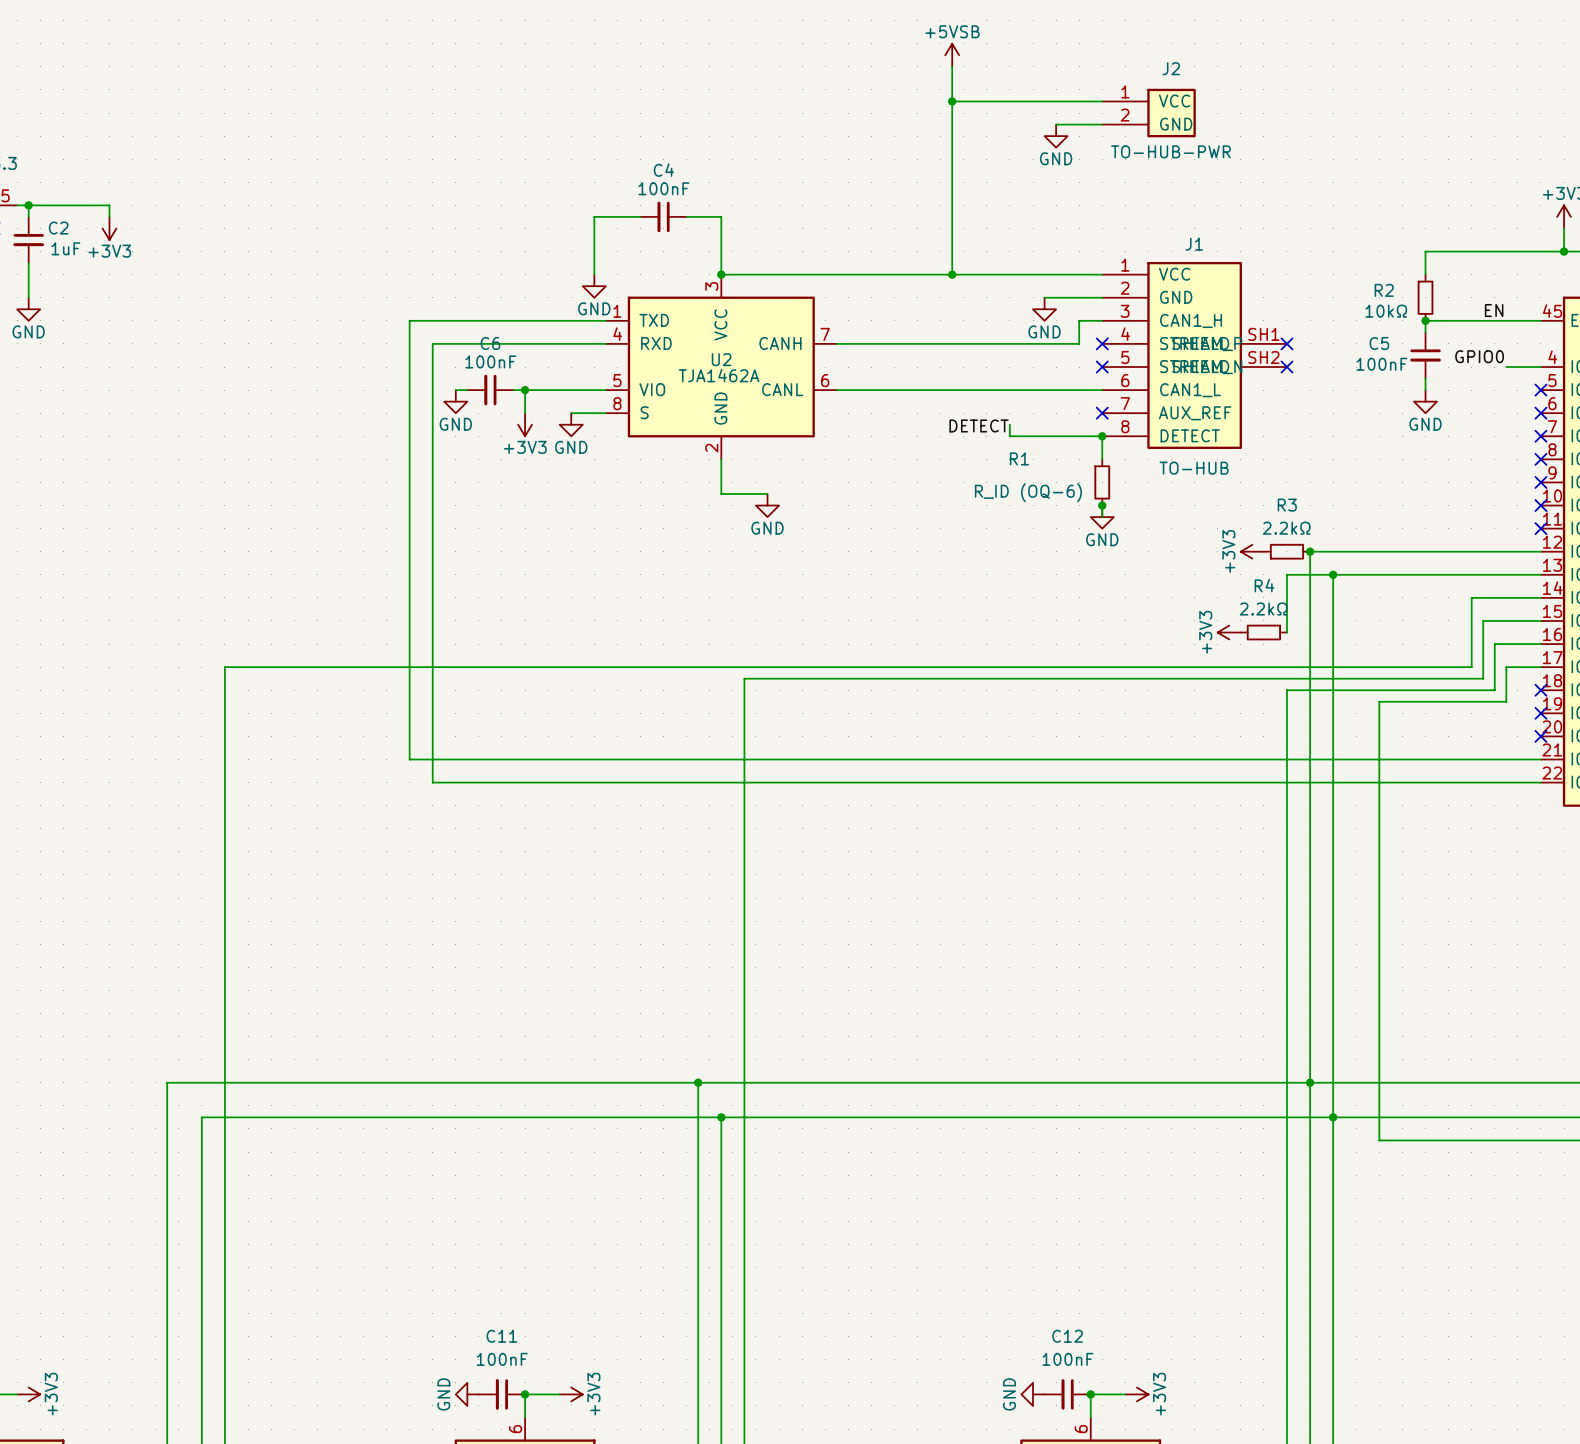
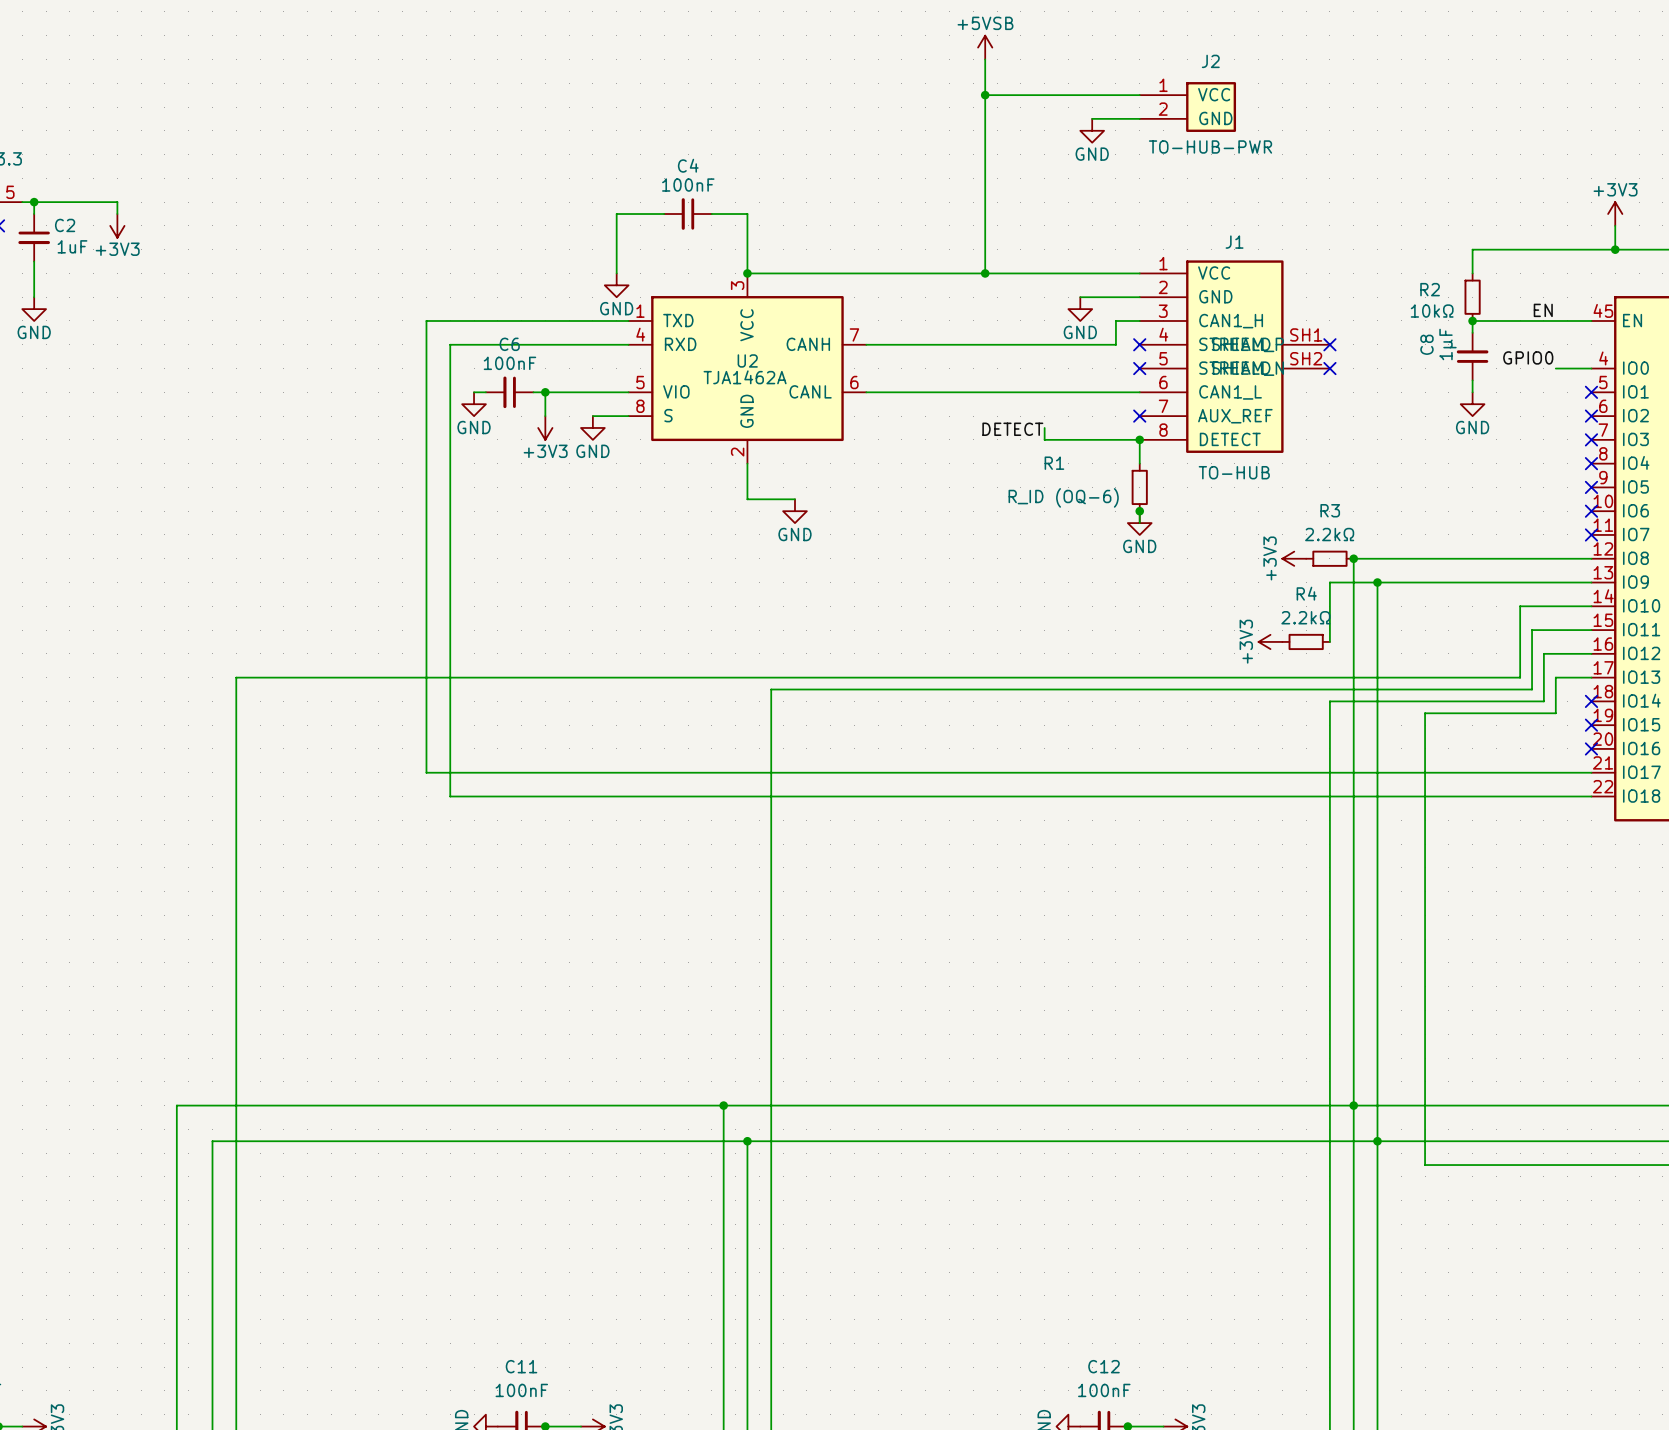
C5: 100nF (1425, 355) -> none
C8: none -> 1µF (1472, 356)

